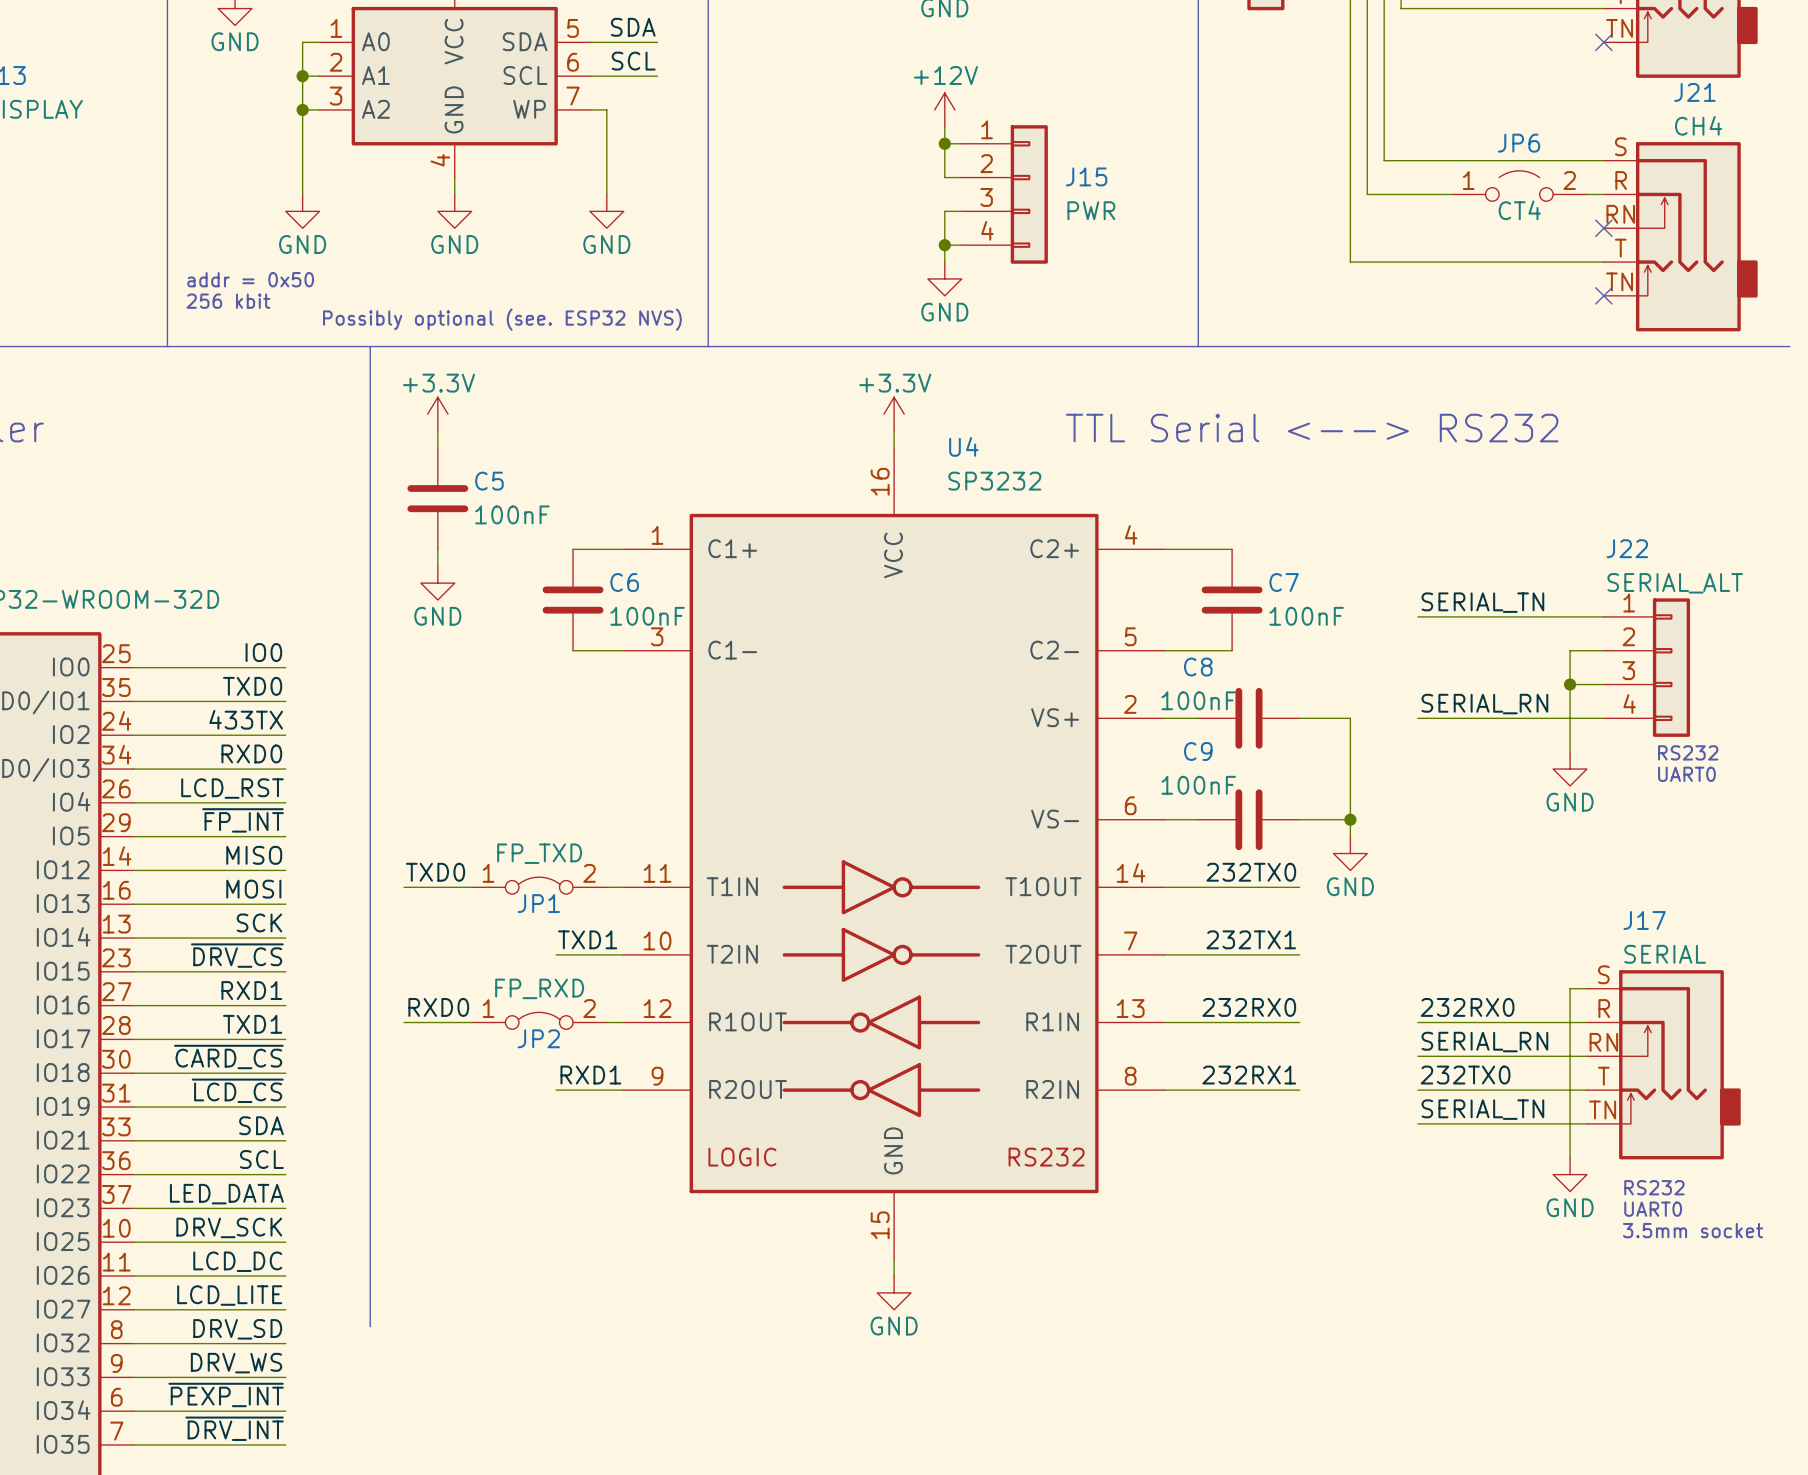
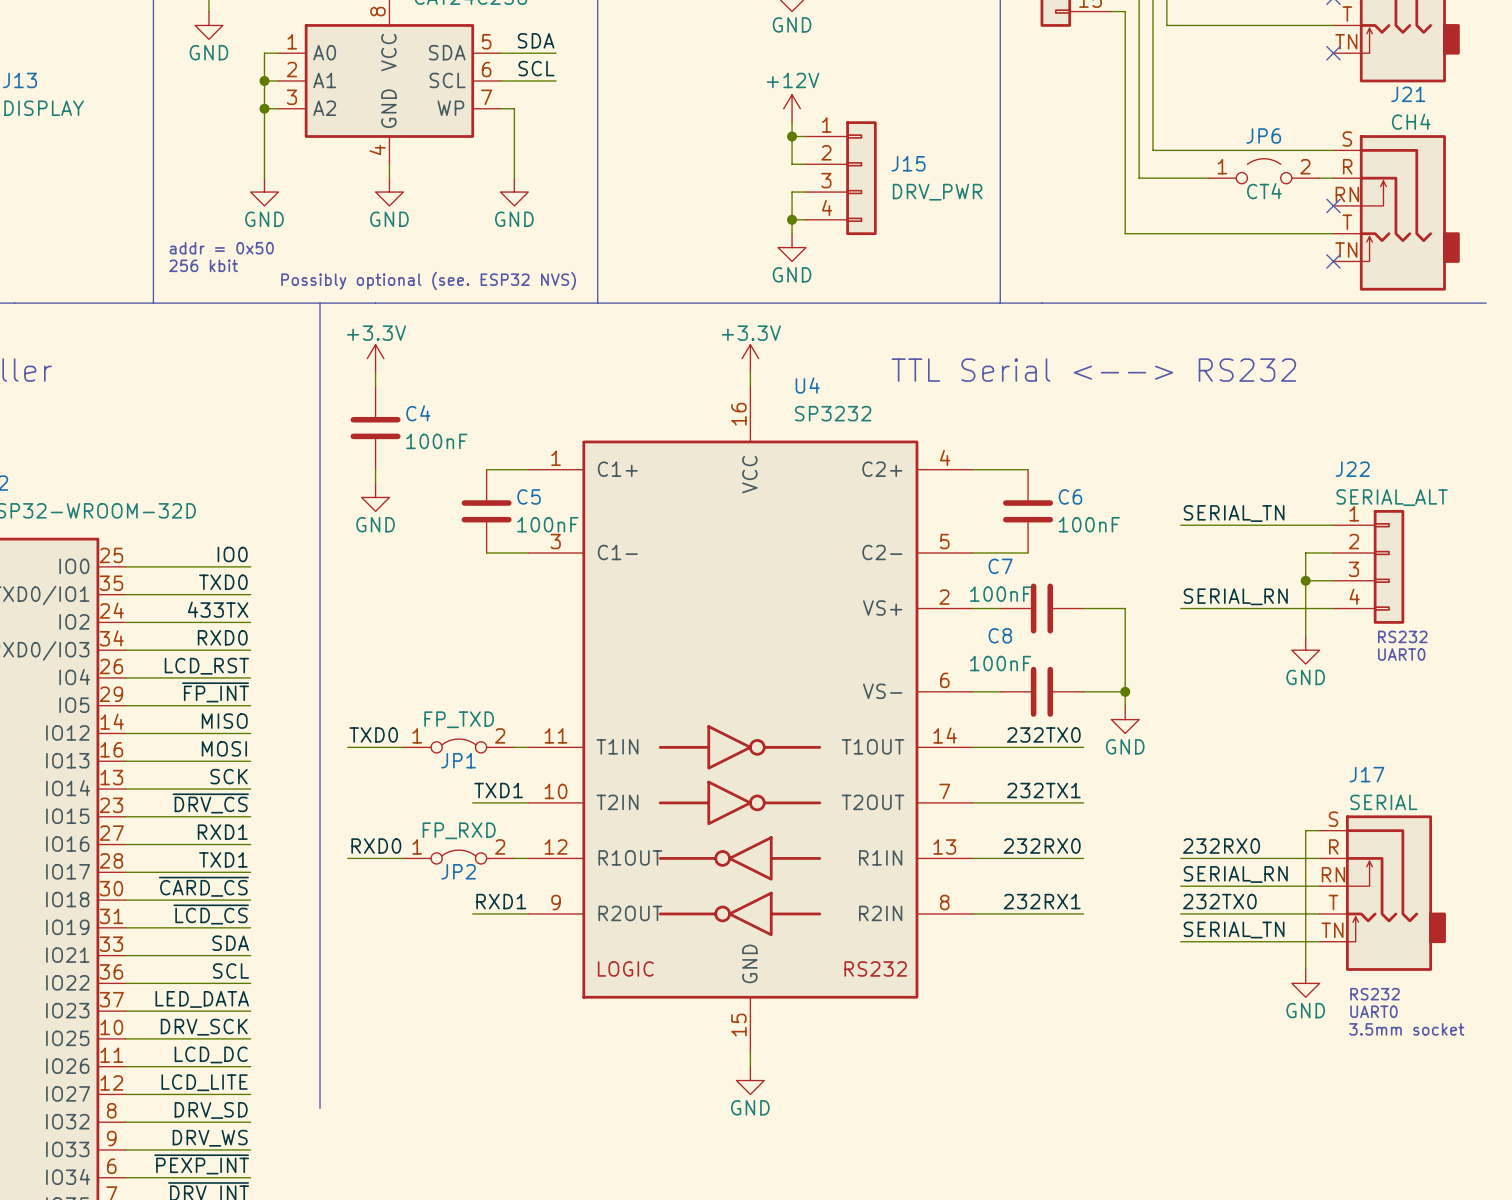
J15 value: PWR (1091, 210) -> DRV_PWR (937, 192)
C5 name: C5 (489, 481) -> C4 (418, 413)
C6 name: C6 (624, 582) -> C5 (529, 496)
C7 name: C7 (1284, 582) -> C6 (1070, 496)
C8 name: C8 (1198, 667) -> C7 (1000, 566)
C9 name: C9 (1198, 751) -> C8 (1000, 635)

